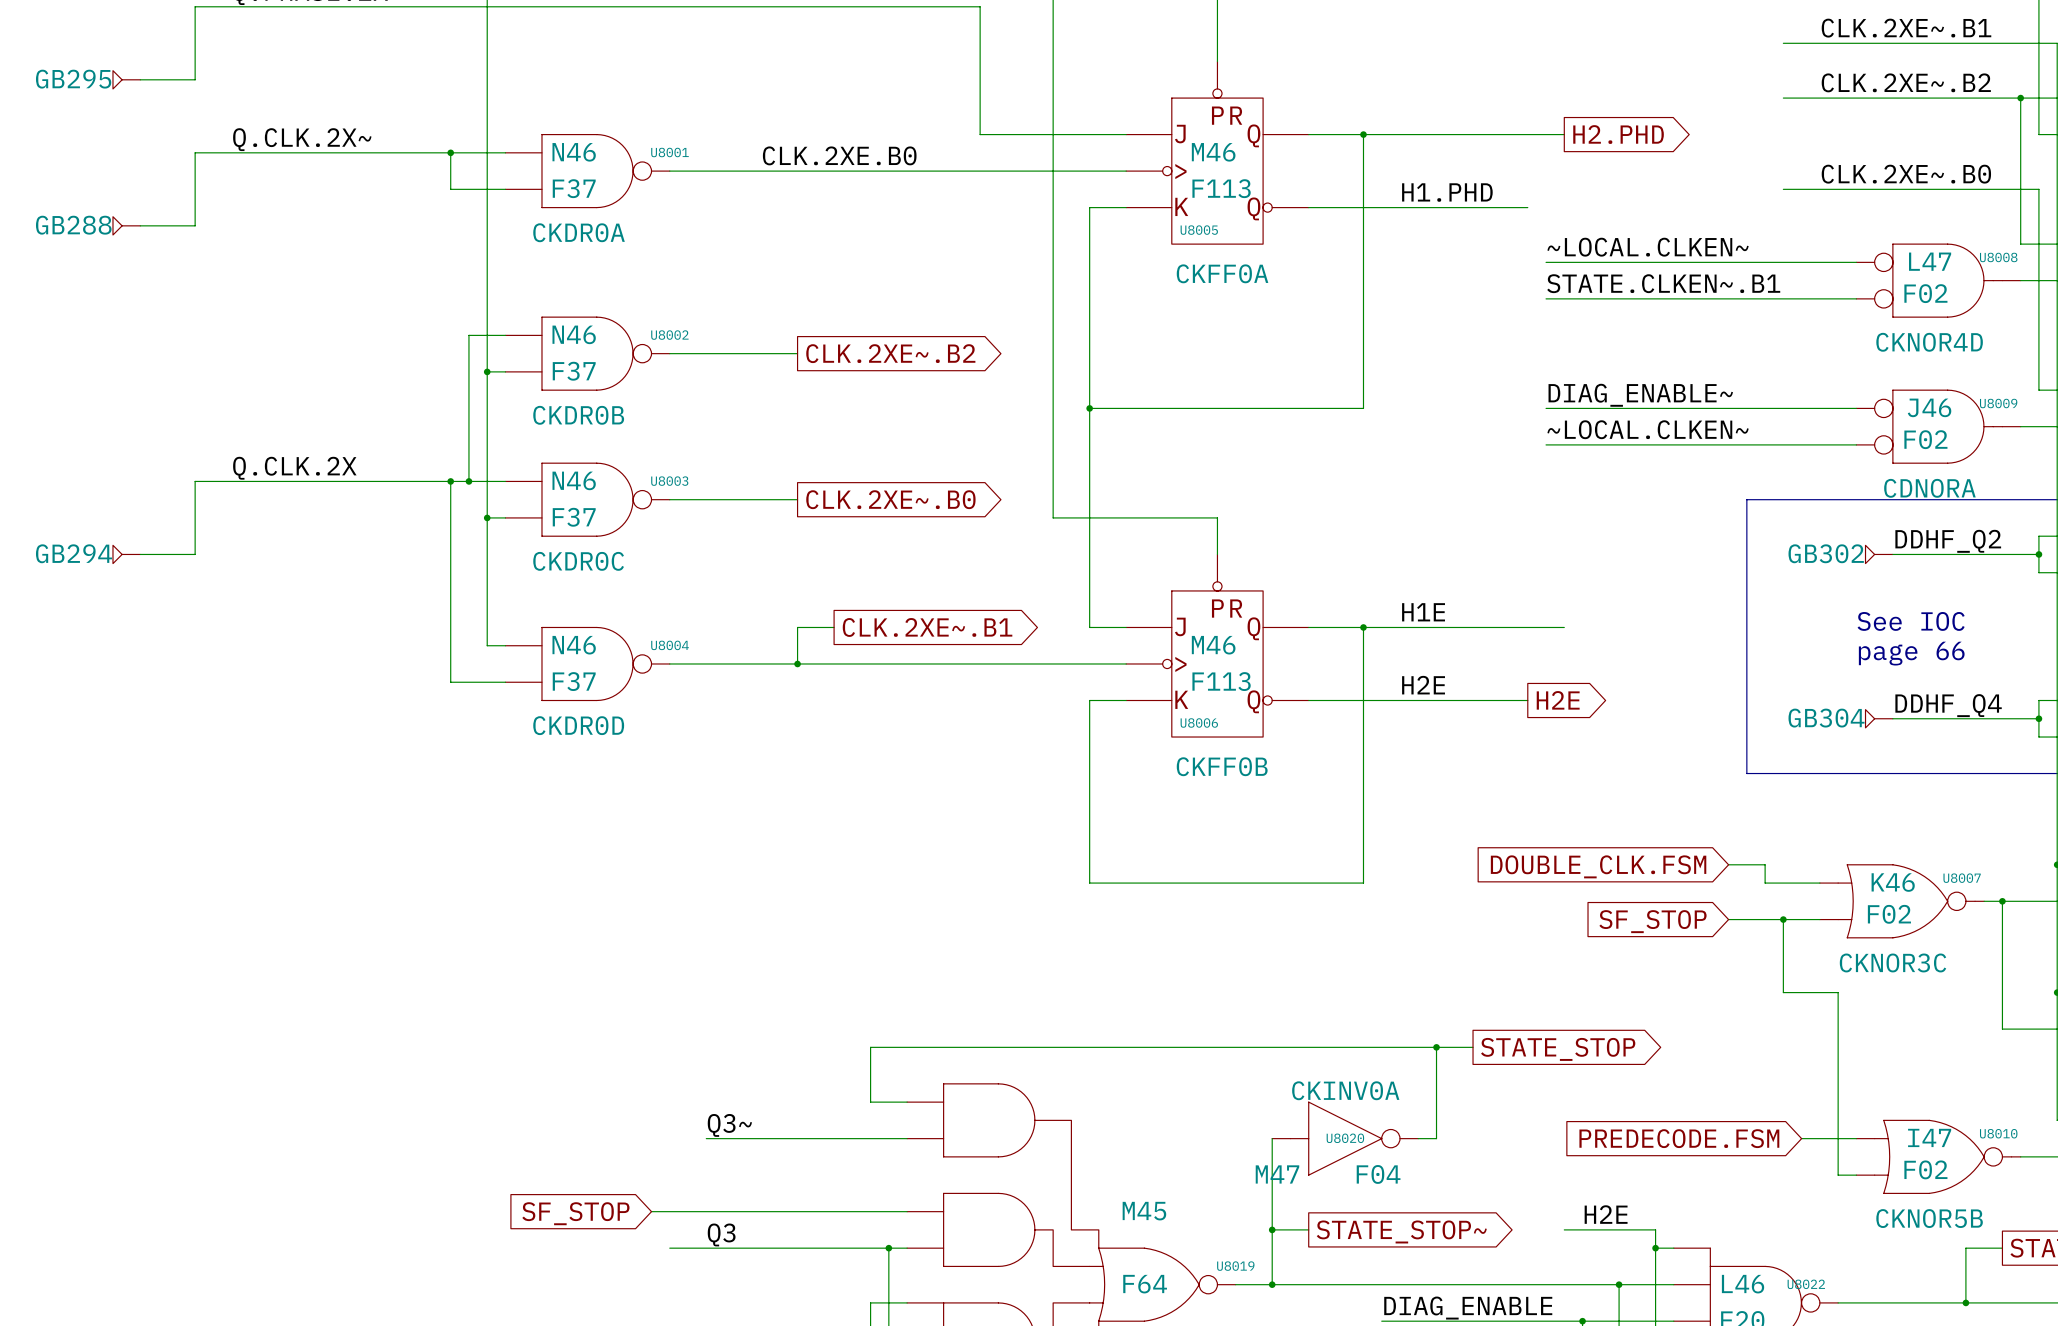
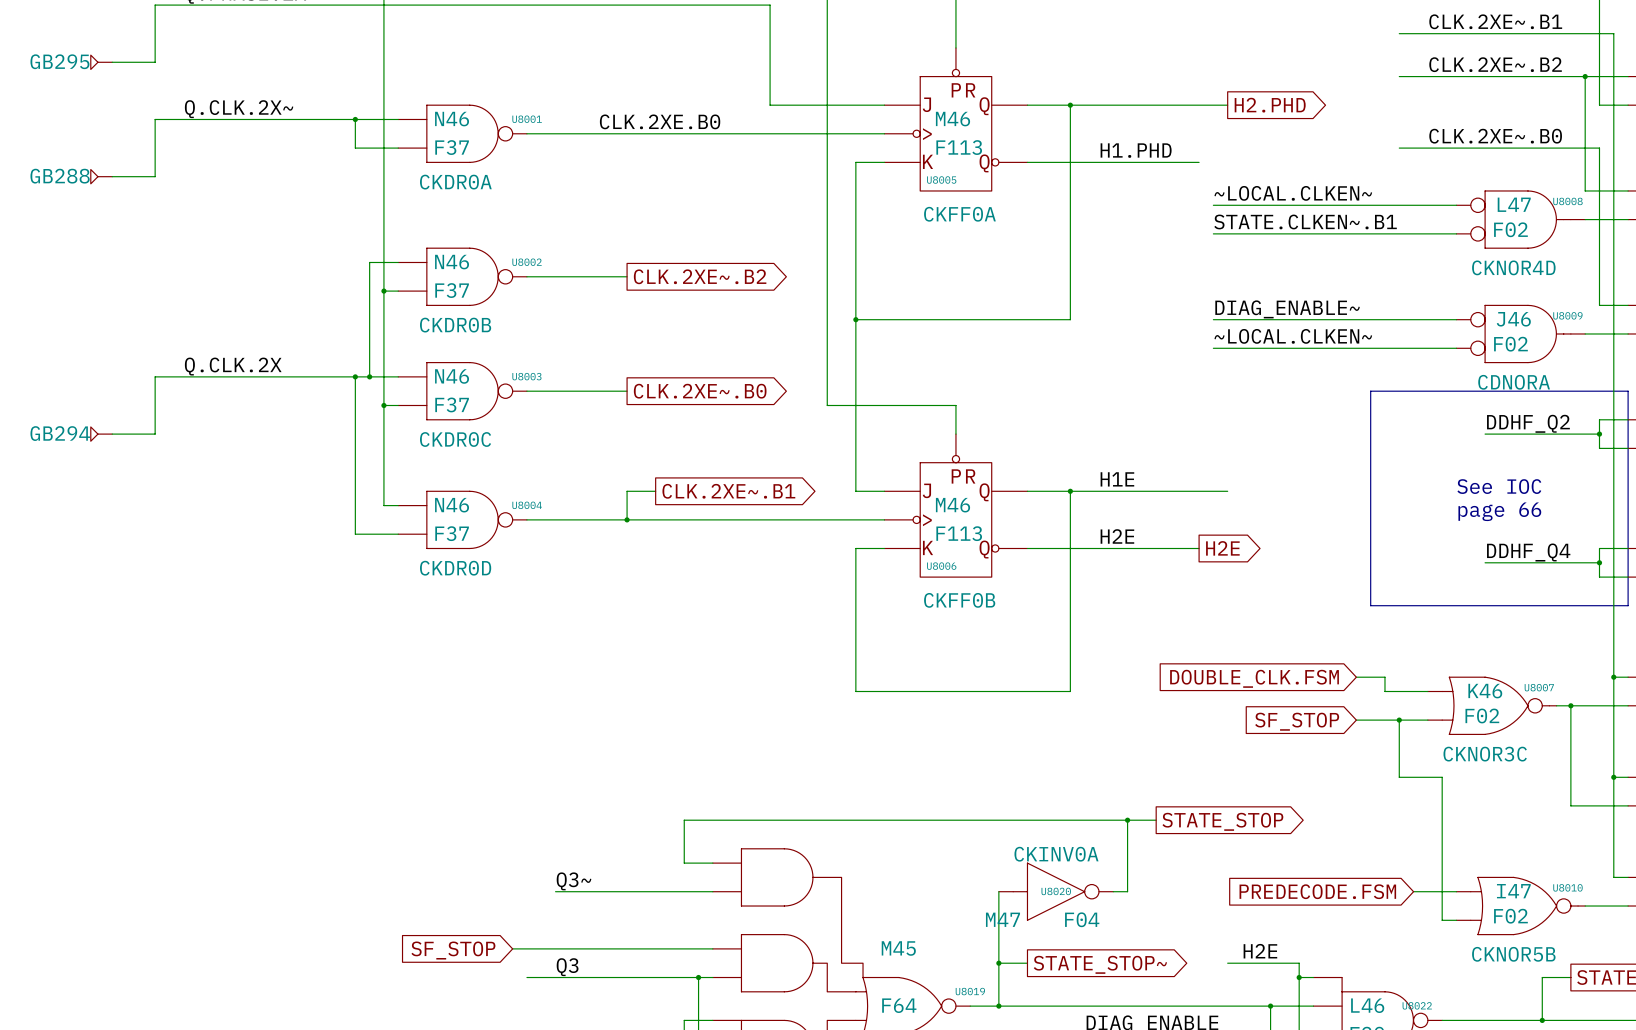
GB302: (1878, 554) -> none
GB304: (1878, 718) -> none

